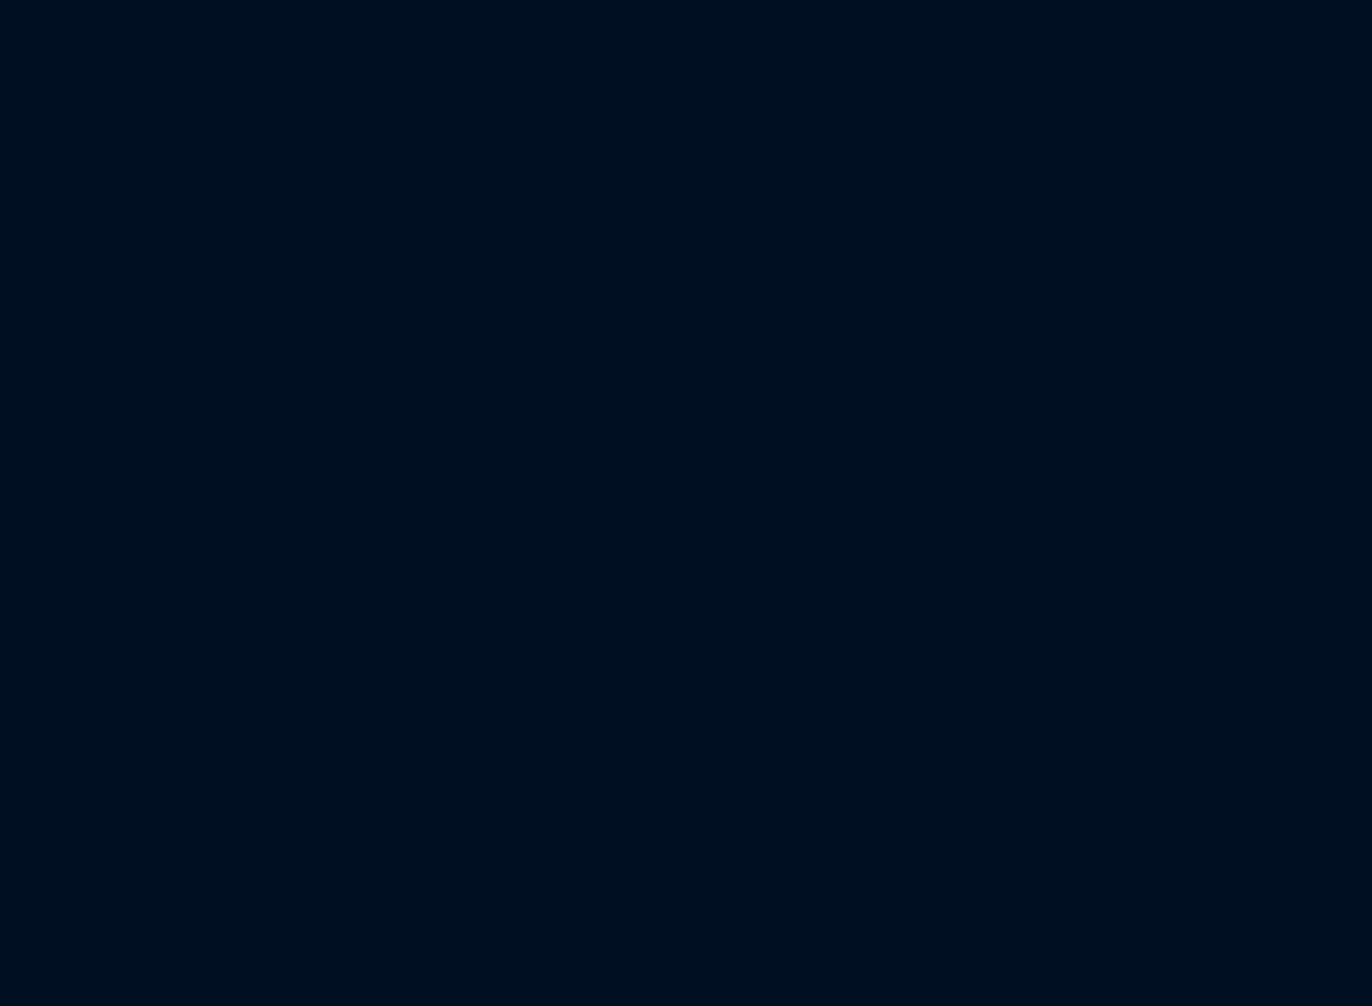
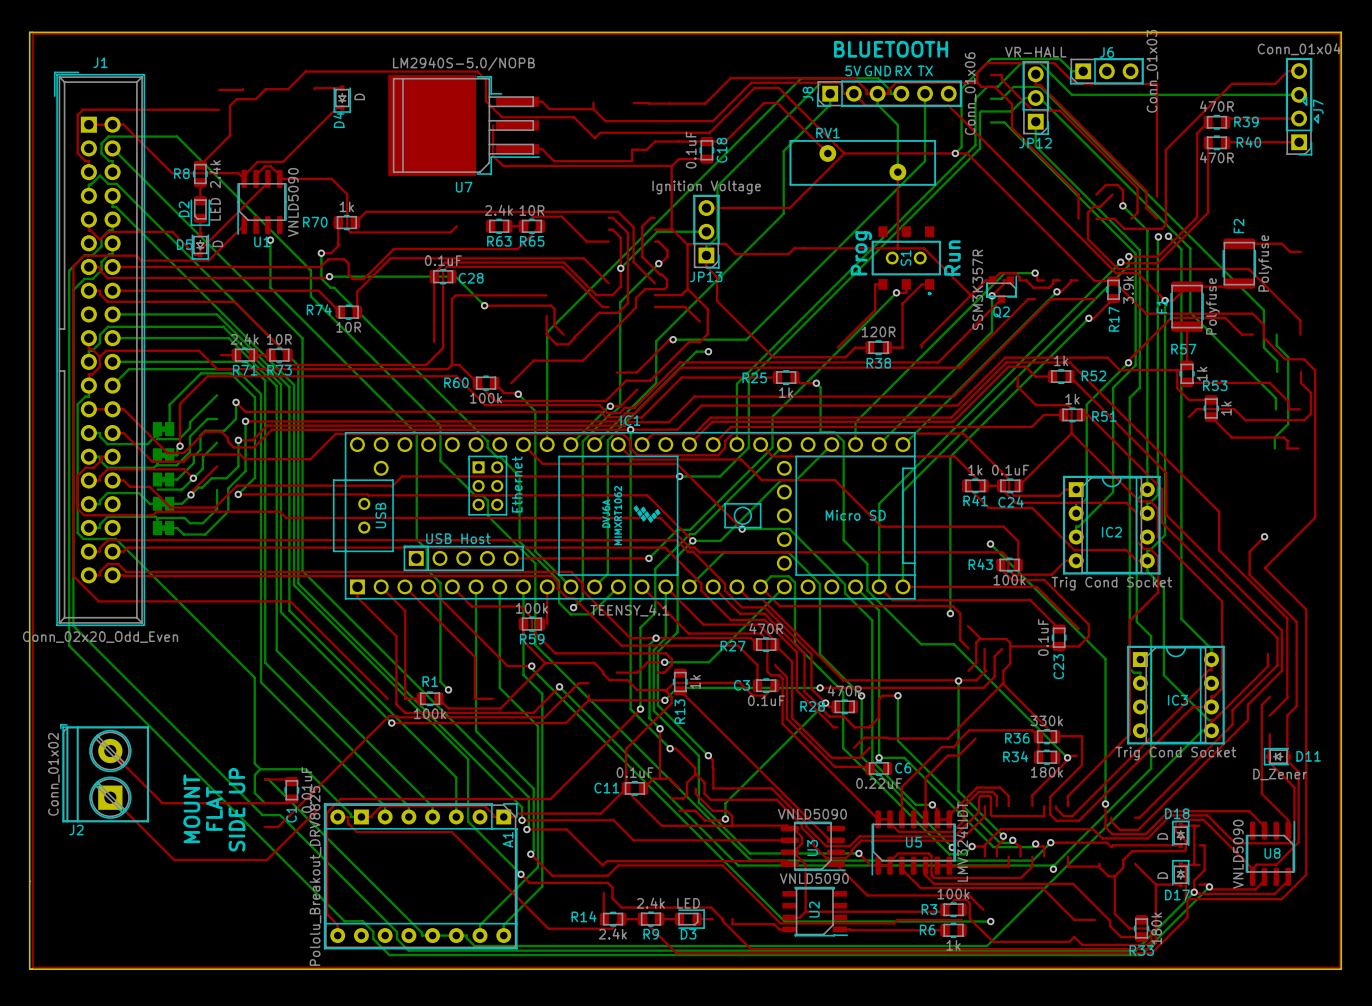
board edge: none -> (29, 32) (1341, 32) (1341, 969) (29, 969) (29, 32)
top track: none -> (32, 33) (32, 967) (1340, 967) (1340, 33) (32, 33)
text: none -> BLUETOOTH (891, 49)
text: none -> 5V (853, 70)
text: none -> GND (877, 70)
text: none -> RX (903, 70)
text: none -> TX (925, 70)
bottom track: none -> (1083, 71) (1072, 71) (1059, 58) (991, 58) (961, 88) (961, 147) (955, 153)
J6: none -> Conn_01x03 (1106, 71)
top track: none -> (1299, 71) (1288, 71) (1275, 83) (1231, 83) (1165, 149) (1165, 224) (1161, 228) (1124, 228) (1114, 218) (1096, 218)
top track: none -> (1035, 74) (1035, 85) (1040, 85) (1146, 191) (1146, 207) (1157, 218)
top track: none -> (990, 75) (1001, 75) (1001, 79) (1032, 110) (1060, 110) (1137, 188) (1137, 212) (1131, 218)
top track: none -> (977, 82) (977, 72) (986, 63) (1054, 63) (1075, 84) (1156, 84) (1156, 196)
top track: none -> (977, 82) (981, 86) (994, 86) (1012, 104) (1012, 128) (1078, 194) (1078, 218)
top track: none -> (977, 82) (896, 82) (888, 90) (888, 93) (866, 93) (866, 90) (854, 78) (730, 78) (705, 103) (633, 103)
top track: none -> (342, 88) (314, 89)
top track: none -> (243, 89) (219, 90)
bottom track: none -> (830, 93) (830, 104) (783, 151) (783, 213) (656, 341) (656, 383) (594, 444)
bottom track: none -> (853, 93) (842, 93) (842, 86) (839, 82) (820, 82) (717, 186) (717, 236) (709, 244) (706, 244) (706, 255)
bottom track: none -> (877, 93) (877, 104) (897, 124) (897, 172)
J8: none -> Conn_01x06 (889, 93)
bottom track: none -> (901, 93) (890, 93) (890, 90) (878, 78) (801, 78) (547, 332) (547, 444)
bottom track: none -> (925, 93) (925, 161) (746, 339) (673, 339)
bottom track: none -> (1299, 94) (1071, 94) (1040, 63) (1021, 63) (997, 86) (987, 86) (975, 98) (975, 145) (736, 383) (736, 444)
JP12: none -> VR-HALL (1035, 97)
line: none -> (1306, 97) (1302, 101) (1306, 104) (1306, 97)
bottom track: none -> (990, 98) (1001, 98) (1013, 86) (1040, 86) (1263, 310) (1263, 347) (1277, 360) (1277, 371)
D4: none -> D (342, 99)
top track: none -> (517, 101) (542, 101) (549, 109) (593, 109)
top track: none -> (593, 103) (593, 109)
J7: none -> Conn_01x04 (1299, 106)
top track: none -> (342, 107) (337, 107) (283, 161) (257, 161) (242, 177)
top track: none -> (219, 109) (83, 109) (77, 115) (77, 153) (85, 161) (88, 161) (88, 172)
top track: none -> (593, 109) (605, 121) (712, 121) (751, 82) (839, 82) (842, 86) (842, 93) (853, 93) (865, 105) (948, 105) (1116, 273) (1137, 273) (1165, 300) (1173, 300) (1187, 286) (1236, 286) (1239, 283)
line: none -> (1318, 115) (1318, 122) (1314, 118) (1318, 115)
top track: none -> (1299, 118) (1229, 118) (1225, 122)
bottom track: none -> (1035, 121) (1035, 146) (1139, 250) (1139, 387) (1129, 397) (1129, 668) (1133, 672) (1140, 672) (1140, 683)
bottom track: none -> (990, 122) (1004, 122) (1135, 253) (1135, 365) (1113, 387) (1113, 492) (1078, 526) (1076, 526) (1076, 537)
top track: none -> (1208, 122) (1197, 133) (1197, 217) (1157, 256) (1128, 256)
R39: none -> 470R (1216, 122)
top track: none -> (88, 124) (123, 124) (172, 173) (238, 173) (244, 178)
U7: none -> LM2940S-5.0/NOPB (463, 125)
top track: none -> (493, 125) (493, 155) (503, 166) (671, 166) (678, 159) (706, 159)
top track: none -> (1208, 142) (1208, 212) (1157, 263) (1120, 262)
R40: none -> 470R (1216, 142)
top track: none -> (1299, 142) (1225, 142)
bottom track: none -> (112, 148) (302, 338) (302, 570) (528, 797) (528, 827) (526, 829)
top track: none -> (517, 149) (542, 149) (554, 161) (632, 161) (632, 149) (646, 149) (655, 141) (725, 141) (763, 103) (777, 103) (827, 153)
C18: none -> 0.1uF (706, 150)
top track: none -> (844, 153) (967, 153) (1094, 281) (1113, 281) (1146, 313) (1252, 313) (1263, 324) (1263, 337) (1285, 359) (1303, 359) (1315, 370) (1315, 517) (1264, 568) (1306, 609) (1306, 874) (1281, 899) (1187, 899)
top track: none -> (844, 153) (778, 88) (754, 88) (709, 132) (600, 132) (594, 138) (573, 117) (502, 117) (486, 101) (486, 80) (477, 71) (305, 71) (288, 89) (265, 89) (255, 99) (236, 99) (230, 105) (230, 135) (200, 165)
top track: none -> (844, 153) (789, 208) (706, 208)
via: none -> (955, 153)
RV1: none -> (862, 162)
top track: none -> (671, 166) (671, 229)
bottom track: none -> (112, 172) (112, 161) (109, 161) (101, 153) (101, 143) (108, 136) (177, 136) (310, 270) (310, 296) (440, 425) (440, 460) (475, 495) (482, 495) (487, 500) (487, 515) (535, 563) (535, 645) (750, 860) (1032, 860) (1050, 842)
top track: none -> (897, 172) (897, 248)
R8: none -> 2.4k (200, 174)
top track: none -> (256, 178) (256, 175) (264, 166) (270, 166) (279, 175) (279, 178) (331, 178) (347, 194) (347, 229) (350, 232) (450, 232) (456, 226)
top track: none -> (267, 178) (267, 182) (200, 248) (200, 254) (195, 254) (172, 231) (107, 231) (99, 239) (88, 230) (88, 219)
top track: none -> (200, 182) (200, 200)
top track: none -> (1096, 194) (1105, 184) (1117, 184) (1122, 190) (1122, 205)
top track: none -> (1112, 194) (1100, 206) (1093, 206) (1087, 212) (1087, 239) (1117, 268) (1248, 268) (1300, 320) (1300, 334)
bottom track: none -> (88, 195) (88, 184) (99, 175) (108, 183) (116, 183) (298, 365) (298, 583) (522, 807) (522, 820)
bottom track: none -> (112, 195) (112, 206) (116, 206) (294, 385) (294, 585) (468, 759) (468, 821) (520, 874)
U1: none -> VNLD5090 (261, 202)
bottom track: none -> (1122, 205) (1147, 230) (1147, 489) (1136, 500) (1136, 621) (1151, 636) (1151, 768) (1054, 865) (738, 865) (559, 686)
via: none -> (1122, 205)
D2: none -> LED (200, 210)
top track: none -> (608, 217) (612, 217) (627, 232) (627, 303) (618, 312) (598, 312) (568, 344) (556, 344) (546, 334) (546, 315)
top track: none -> (654, 217) (650, 217) (642, 226) (642, 256) (667, 279) (667, 286) (664, 289) (645, 289) (636, 298) (636, 307) (582, 360) (533, 360) (511, 383)
top track: none -> (200, 218) (200, 235)
bottom track: none -> (112, 219) (112, 230) (109, 230) (101, 238) (101, 246) (92, 255) (84, 255) (69, 270) (69, 645) (344, 921) (362, 921) (373, 931) (373, 938) (389, 955) (1141, 955) (1209, 886)
top track: none -> (338, 222) (339, 244) (331, 253) (321, 253)
R70: none -> 1k (346, 222)
top track: none -> (355, 222) (365, 211) (618, 211) (633, 227) (633, 261) (654, 283)
top track: none -> (244, 225) (208, 260) (141, 260) (136, 255) (84, 255) (73, 266) (73, 575) (98, 601) (290, 601) (387, 698)
R63: none -> 2.4k (499, 226)
top track: none -> (507, 226) (523, 226) (533, 216) (561, 216) (586, 241) (608, 241)
R65: none -> 10R (531, 226)
top track: none -> (540, 226) (517, 248) (393, 248) (363, 279) (353, 279) (348, 274) (348, 263) (344, 259) (328, 259) (320, 267) (112, 267)
top track: none -> (608, 229) (612, 229) (620, 237) (620, 286) (612, 295) (596, 295) (564, 262) (444, 262) (434, 272) (434, 342)
top track: none -> (654, 229) (672, 229) (687, 244)
bottom track: none -> (706, 231) (657, 231) (620, 268)
JP13: none -> Ignition Voltage (706, 231)
bottom track: none -> (1158, 236) (1157, 494) (1149, 502) (1147, 502) (1147, 513)
via: none -> (1158, 236)
bottom track: none -> (1168, 236) (1181, 249) (1181, 618) (1211, 649) (1211, 659)
via: none -> (1168, 236)
bottom track: none -> (270, 240) (270, 287) (416, 434) (416, 539) (426, 549) (426, 569) (440, 583) (440, 681) (448, 689)
via: none -> (270, 240)
top track: none -> (654, 241) (658, 241) (667, 250) (667, 256) (658, 263)
bottom track: none -> (112, 243) (112, 254) (109, 254) (101, 262) (101, 270) (92, 278) (84, 278) (73, 290) (73, 625) (262, 815) (280, 815) (397, 931) (397, 939) (408, 950) (1135, 950) (1194, 892)
top track: none -> (1239, 243) (1281, 243) (1289, 251) (1300, 251)
top track: none -> (687, 244) (726, 244) (736, 254) (788, 254) (794, 248) (924, 248) (971, 295)
top track: none -> (687, 244) (687, 289)
D5: none -> D (200, 245)
bottom track: none -> (321, 253) (321, 278) (330, 287) (334, 287) (487, 441) (487, 447) (519, 476) (519, 541) (559, 580) (559, 602) (570, 614) (590, 614) (618, 586)
via: none -> (321, 253)
text: none -> Prog (861, 253)
top track: none -> (706, 255) (706, 266) (717, 277) (717, 300) (773, 357) (845, 357) (855, 347) (869, 347)
bottom track: none -> (1128, 256) (1128, 265) (902, 491) (902, 586)
via: none -> (1128, 256)
text: none -> Run (952, 258)
S1: none -> (906, 260)
bottom track: none -> (1120, 262) (879, 503) (879, 586)
via: none -> (1120, 262)
bottom track: none -> (658, 263) (620, 302) (620, 406) (582, 441) (582, 598) (573, 607)
via: none -> (658, 263)
F2: none -> Polyfuse (1239, 263)
top track: none -> (88, 267) (99, 267) (99, 270) (107, 278) (329, 276)
via: none -> (620, 268)
top track: none -> (1035, 273) (1037, 280) (1043, 280)
bottom track: none -> (1035, 273) (1004, 273) (855, 422) (855, 444)
via: none -> (1035, 273)
bottom track: none -> (329, 276) (455, 276) (484, 305)
via: none -> (329, 276)
C28: none -> 0.1uF (443, 276)
top track: none -> (1010, 280) (1003, 280) (1003, 284) (992, 295)
top track: none -> (1059, 280) (1053, 280) (1053, 283) (1049, 287) (1033, 287) (1026, 280) (1019, 280) (1019, 277) (1015, 273) (999, 273) (992, 280) (985, 280) (921, 344) (921, 347)
top track: none -> (1077, 280) (1070, 280) (1061, 291) (1056, 291)
top track: none -> (608, 283) (583, 258) (390, 258) (357, 291) (357, 312)
top track: none -> (882, 284) (875, 284) (875, 310) (837, 347)
top track: none -> (906, 284) (906, 292) (896, 292)
top track: none -> (929, 284) (921, 284) (902, 303) (902, 347) (887, 347)
top track: none -> (687, 289) (707, 309) (707, 334) (699, 342) (688, 342) (650, 380) (626, 380) (605, 400) (495, 400) (459, 364) (452, 364)
top track: none -> (687, 289) (681, 295) (654, 295)
Q2: none -> SSM3K357R (1001, 289)
R17: none -> 3.9k (1113, 289)
top track: none -> (88, 290) (99, 290) (99, 294) (107, 301) (234, 301) (287, 355)
top track: none -> (112, 290) (318, 290) (340, 312)
bottom track: none -> (1056, 291) (902, 444)
via: none -> (1056, 291)
bottom track: none -> (896, 292) (772, 416) (772, 447) (690, 529) (677, 529) (648, 558)
via: none -> (896, 292)
top track: none -> (546, 295) (455, 295) (452, 299) (452, 364)
bottom track: none -> (992, 295) (992, 331) (879, 444)
via: none -> (992, 295)
top track: none -> (1094, 298) (1051, 299) (953, 396) (694, 396) (668, 422) (628, 422) (624, 425) (267, 425) (252, 440) (238, 440)
top track: none -> (1113, 298) (1093, 318) (1088, 318)
top track: none -> (1001, 299) (938, 362) (679, 362) (634, 407) (624, 407) (619, 413) (607, 413) (599, 405) (485, 405) (456, 376) (207, 376) (180, 403) (180, 446)
top track: none -> (1035, 299) (1028, 299) (959, 367) (680, 367) (635, 413) (625, 413) (621, 417) (605, 417) (600, 411) (245, 411) (236, 402)
bottom track: none -> (1165, 300) (1165, 535) (1149, 550) (1147, 550) (1147, 571) (1163, 587) (1163, 675) (1208, 720) (1211, 720) (1211, 730) (1201, 730) (986, 946) (474, 946) (466, 938) (466, 935) (422, 935) (422, 932) (268, 779) (264, 779)
via: none -> (1165, 300)
top track: none -> (484, 305) (551, 305) (554, 309) (554, 325) (563, 334)
via: none -> (484, 305)
top track: none -> (608, 306) (602, 306) (562, 266) (447, 266) (443, 270) (443, 348) (426, 364) (280, 364) (270, 355) (253, 355)
top track: none -> (654, 306) (685, 306) (699, 321)
F1: none -> Polyfuse (1187, 306)
R74: none -> 10R (348, 312)
bottom track: none -> (112, 314) (216, 314) (289, 386) (289, 610) (456, 777) (456, 816)
bottom track: none -> (1088, 318) (950, 456) (950, 613)
via: none -> (1088, 318)
top track: none -> (1187, 326) (1187, 365) (1182, 370) (1119, 370) (1107, 357) (1005, 357) (957, 405) (701, 405) (677, 429) (271, 429) (254, 447) (233, 447) (221, 431) (205, 431) (184, 452) (167, 452) (123, 409) (88, 409)
top track: none -> (1252, 334) (1241, 334) (1225, 317) (1171, 317) (1128, 362)
bottom track: none -> (1276, 334) (1276, 345) (1288, 357) (1288, 424) (1274, 437) (1274, 448)
top track: none -> (88, 338) (88, 349) (92, 349) (99, 356)
bottom track: none -> (112, 338) (228, 338) (276, 386) (276, 650) (432, 806) (432, 816)
top track: none -> (673, 339) (669, 339) (636, 372) (616, 372)
via: none -> (673, 339)
R38: none -> 120R (878, 347)
J1: none -> Conn_02x20_Odd_Even (99, 348)
bottom track: none -> (708, 351) (696, 351) (607, 440) (607, 573) (594, 586)
via: none -> (708, 351)
top track: none -> (220, 355) (236, 355)
R71: none -> 2.4k (244, 355)
R73: none -> 10R (279, 355)
top track: none -> (99, 356) (99, 366) (92, 374) (88, 374) (88, 385)
top track: none -> (99, 356) (106, 350) (199, 350) (217, 369) (447, 369) (452, 364)
bottom track: none -> (88, 361) (88, 350) (92, 350) (99, 343) (99, 334) (108, 326) (223, 326) (280, 384) (280, 612) (391, 723)
bottom track: none -> (112, 361) (246, 361) (265, 380) (265, 662) (408, 806) (408, 816)
bottom track: none -> (1128, 362) (1086, 404) (1086, 498) (1082, 502) (1076, 502) (1076, 513)
via: none -> (1128, 362)
top track: none -> (1177, 370) (1177, 388) (1188, 399) (1211, 399)
top track: none -> (1300, 371) (1300, 382) (1310, 392) (1310, 413) (1304, 420) (1245, 420) (1234, 409) (1196, 409) (1188, 417)
R57: none -> 1k (1187, 373)
top track: none -> (1017, 376) (1017, 386) (1036, 405) (1068, 405) (1071, 408) (1071, 433)
top track: none -> (1052, 376) (1035, 376) (1025, 366) (1008, 366) (953, 421) (712, 421) (689, 444)
R52: none -> 1k (1061, 376)
top track: none -> (1069, 376) (1166, 472) (1166, 514) (1282, 630) (1282, 670) (1247, 704) (1247, 720) (1138, 829) (1119, 829) (1111, 821) (1111, 817)
top track: none -> (777, 377) (681, 377) (641, 417) (627, 417) (623, 421) (244, 421)
R25: none -> 1k (786, 377)
top track: none -> (794, 377) (800, 383) (816, 383)
top track: none -> (1187, 382) (1269, 382) (1288, 401) (1288, 409) (1299, 409)
R60: none -> 100k (486, 383)
top track: none -> (494, 383) (504, 393) (518, 394)
bottom track: none -> (816, 383) (820, 387) (820, 432) (834, 432) (843, 441) (843, 540) (867, 563) (867, 590) (921, 644) (954, 644) (1067, 757)
via: none -> (816, 383)
bottom track: none -> (88, 385) (88, 396) (85, 396) (77, 404) (77, 533) (83, 538) (116, 538) (254, 677) (254, 763) (260, 769)
bottom track: none -> (112, 385) (129, 369) (236, 369) (261, 394) (261, 682) (385, 806) (385, 816)
top track: none -> (637, 389) (620, 406) (610, 406)
bottom track: none -> (518, 394) (535, 411) (535, 551) (570, 586)
via: none -> (518, 394)
bottom track: none -> (217, 395) (189, 422) (189, 428) (179, 439) (157, 439) (157, 429)
bottom track: none -> (236, 402) (236, 418) (224, 430) (205, 430) (200, 435) (200, 449) (193, 456) (193, 463) (177, 479) (169, 479)
via: none -> (236, 402)
bottom track: none -> (610, 406) (570, 444)
via: none -> (610, 406)
R53: none -> 1k (1211, 408)
bottom track: none -> (1275, 409) (1275, 398) (1190, 312) (1190, 248) (1039, 97) (1024, 97) (1011, 111) (979, 112) (979, 148) (748, 379) (748, 447) (720, 476) (679, 476)
top track: none -> (1063, 414) (1043, 414) (1031, 426) (730, 426) (713, 444)
R51: none -> 1k (1072, 414)
top track: none -> (1081, 414) (1087, 414) (1162, 489) (1162, 522) (1277, 637) (1277, 665) (1232, 710) (1232, 724) (1139, 817) (1135, 817)
top track: none -> (1211, 417) (1231, 437) (1284, 437) (1287, 440) (1287, 448) (1298, 448)
bottom track: none -> (217, 418) (207, 418) (189, 436) (189, 452) (176, 465) (157, 465) (157, 455)
bottom track: none -> (245, 421) (245, 471) (228, 488) (228, 511) (205, 534) (183, 534) (177, 528) (169, 528)
via: none -> (245, 421)
part: none -> (163, 429)
bottom track: none -> (169, 429) (169, 404) (201, 373) (230, 373) (255, 397) (255, 477) (238, 494)
bottom track: none -> (630, 429) (630, 709) (670, 748)
via: none -> (630, 429)
bottom track: none -> (88, 433) (99, 433) (99, 436) (107, 444) (147, 444) (157, 434)
top track: none -> (112, 433) (123, 433) (152, 461) (183, 461) (190, 454) (240, 454) (244, 459) (310, 459) (335, 434) (623, 434) (630, 440) (630, 448) (637, 455) (717, 455) (725, 448) (725, 441) (732, 433) (963, 433) (1009, 479) (1009, 490) (1014, 495) (1059, 495) (1065, 489) (1076, 489)
top track: none -> (1071, 433) (1139, 501) (1150, 501) (1157, 508) (1157, 537) (1222, 601) (1222, 688) (1214, 696) (1211, 696) (1211, 706) (1192, 706) (1079, 820) (1056, 820) (1050, 814) (1050, 796) (1082, 765) (1082, 736) (1055, 736)
top track: none -> (1071, 433) (1019, 485)
bottom track: none -> (238, 440) (238, 466) (226, 478) (211, 478) (202, 487) (198, 487) (182, 503) (149, 503) (139, 493) (107, 493) (99, 500) (99, 504) (88, 504)
via: none -> (238, 440)
bottom track: none -> (217, 442) (202, 456) (202, 468) (182, 489) (157, 489)
top track: none -> (523, 444) (542, 463) (677, 463) (742, 529)
top track: none -> (618, 444) (633, 459) (741, 459) (761, 480) (834, 480) (881, 526) (1003, 526) (1018, 541) (1018, 565)
top track: none -> (642, 444) (652, 434) (694, 434) (710, 417) (951, 417) (1006, 362) (1069, 362) (1219, 511) (1219, 550) (1287, 618) (1287, 698) (1269, 715)
top track: none -> (760, 444) (772, 456) (954, 456) (984, 485) (1001, 485) (1001, 488) (1015, 502) (1126, 502) (1136, 513) (1136, 541) (1144, 548) (1150, 548) (1158, 556) (1158, 592) (1129, 620) (1129, 734) (1067, 796) (1067, 806)
bottom track: none -> (784, 444) (694, 534) (689, 534) (655, 568) (655, 612) (640, 627) (640, 709)
bottom track: none -> (831, 444) (796, 480) (781, 480) (720, 540) (692, 540) (677, 555) (677, 632) (657, 651) (657, 705) (708, 755)
bottom track: none -> (180, 446) (177, 448) (177, 455) (169, 455)
via: none -> (180, 446)
part: none -> (163, 455)
bottom track: none -> (88, 456) (99, 456) (99, 460) (107, 467) (153, 467) (157, 464)
top track: none -> (112, 456) (101, 456) (101, 460) (93, 467) (85, 467) (77, 475) (77, 508) (84, 515) (153, 515) (156, 511) (279, 511) (286, 518) (660, 518) (689, 547) (694, 547) (699, 552) (1002, 552) (1008, 558) (1008, 569) (1013, 574) (1051, 574) (1065, 560) (1076, 560)
top track: none -> (217, 466) (190, 492) (190, 494)
top track: none -> (679, 476) (402, 476) (391, 486)
via: none -> (679, 476)
top track: none -> (193, 478) (184, 469) (107, 469) (99, 476) (99, 480) (88, 480)
via: none -> (193, 478)
part: none -> (163, 479)
top track: none -> (112, 480) (123, 480) (130, 486) (149, 486) (170, 507) (215, 507) (237, 485) (392, 485)
top track: none -> (966, 485) (988, 508) (1032, 508) (1074, 550) (1126, 550) (1136, 560) (1147, 560)
R41: none -> 1k (975, 485)
C24: none -> 0.1uF (1010, 485)
bottom track: none -> (217, 490) (217, 509) (202, 523) (189, 523) (184, 518) (157, 518) (157, 528)
via: none -> (190, 494)
top track: none -> (238, 494) (647, 495) (692, 540)
via: none -> (238, 494)
part: none -> (163, 503)
IC1: none -> TEENSY_4.1 (624, 515)
bottom track: none -> (157, 518) (155, 516) (107, 516) (99, 524) (99, 527) (88, 527)
IC2: none -> Trig Cond Socket (1111, 525)
part: none -> (163, 528)
bottom track: none -> (742, 529) (789, 528) (845, 584) (845, 593) (872, 620) (872, 761) (915, 804) (932, 804)
via: none -> (742, 529)
top track: none -> (1264, 536) (1249, 551) (1249, 574) (1296, 621) (1296, 706) (1287, 715) (1287, 750) (1288, 761) (1298, 772) (1298, 842) (1276, 864) (1256, 864) (1252, 868)
via: none -> (1264, 536)
via: none -> (692, 540)
bottom track: none -> (990, 544) (1105, 659) (1105, 804)
via: none -> (990, 544)
top track: none -> (88, 551) (99, 551) (99, 548) (107, 540) (676, 540) (688, 551) (693, 551) (725, 583) (725, 590) (741, 607) (764, 607) (811, 654) (811, 688) (829, 706) (835, 706)
top track: none -> (112, 551) (123, 551) (127, 547) (665, 547) (701, 583) (701, 590) (730, 620) (764, 620) (796, 652) (796, 690) (833, 727) (837, 727)
top track: none -> (511, 558) (648, 558)
via: none -> (648, 558)
top track: none -> (1000, 565) (1000, 568) (1012, 580) (1044, 580) (1088, 624) (1088, 636) (1078, 646) (1010, 646)
R43: none -> 100k (1009, 565)
top track: none -> (88, 575) (99, 575) (99, 571) (107, 564) (118, 564) (126, 571) (571, 571) (582, 583) (582, 590) (630, 638) (751, 638) (757, 644)
top track: none -> (112, 575) (551, 576) (557, 582) (557, 588) (567, 598) (574, 598) (621, 645) (737, 645) (757, 665) (757, 685)
top track: none -> (357, 586) (357, 597) (396, 636) (396, 704) (405, 712) (533, 712) (559, 686)
top track: none -> (381, 586) (405, 610) (405, 698) (421, 698)
top track: none -> (404, 586) (474, 656) (474, 698) (492, 698)
top track: none -> (428, 586) (507, 666) (531, 666)
top track: none -> (452, 586) (471, 606) (520, 606) (531, 617) (531, 629) (555, 653) (665, 653) (671, 659) (671, 664) (664, 672) (657, 672)
bottom track: none -> (476, 586) (476, 731) (533, 788) (533, 851) (530, 854)
bottom track: none -> (499, 586) (499, 687) (537, 726) (537, 867) (480, 925) (480, 935)
bottom track: none -> (523, 586) (523, 675) (542, 693) (542, 886) (503, 925) (503, 935)
top track: none -> (547, 586) (547, 624)
top track: none -> (642, 586) (688, 633) (760, 633) (767, 639) (767, 671) (771, 675) (779, 675) (782, 678) (782, 723) (878, 819) (890, 819) (890, 823) (898, 831) (952, 831) (963, 820) (963, 807) (978, 791) (992, 791) (996, 796) (996, 806)
top track: none -> (665, 586) (703, 624) (758, 624) (774, 640) (774, 644) (792, 661) (792, 718) (831, 757) (859, 757) (870, 747)
bottom track: none -> (665, 586) (665, 638) (653, 650) (653, 710) (698, 755) (698, 802) (749, 853) (858, 853)
bottom track: none -> (689, 586) (723, 552) (788, 552) (819, 583) (819, 654) (861, 695) (861, 756) (952, 847)
top track: none -> (713, 586) (740, 613) (764, 613) (804, 653) (804, 691) (829, 716) (843, 716) (854, 727) (869, 727) (878, 717) (878, 699) (882, 695) (897, 695)
top track: none -> (736, 586) (749, 599) (762, 599) (843, 680) (976, 680) (985, 670) (984, 648)
top track: none -> (760, 586) (779, 606) (952, 606) (960, 613) (960, 640) (968, 648)
bottom track: none -> (760, 586) (771, 576) (788, 576) (794, 582) (794, 643) (843, 692) (843, 748) (949, 854) (964, 854) (972, 846)
bottom track: none -> (784, 586) (708, 662) (664, 662)
bottom track: none -> (855, 586) (879, 610) (879, 757) (904, 757) (993, 847) (1032, 847) (1035, 843)
top track: none -> (879, 586) (892, 600) (1030, 600) (1059, 628)
top track: none -> (902, 586) (1036, 586) (1078, 628)
via: none -> (573, 607)
via: none -> (950, 613)
top track: none -> (523, 624) (523, 641) (545, 663)
R59: none -> 100k (531, 624)
top track: none -> (967, 625) (979, 639)
C23: none -> 0.1uF (1059, 637)
bottom track: none -> (656, 638) (649, 644) (649, 718) (660, 728)
via: none -> (656, 638)
top track: none -> (979, 639) (1006, 639) (1010, 643) (1010, 663) (1003, 670) (1003, 683) (948, 738) (887, 738)
top track: none -> (979, 639) (976, 642) (976, 662) (968, 670)
R27: none -> 470R (766, 644)
top track: none -> (1002, 648) (994, 656) (994, 676) (983, 687) (820, 687)
top track: none -> (1267, 653) (1267, 666) (1214, 720) (1211, 720) (1211, 730)
top track: none -> (1211, 659) (1211, 670) (1208, 670) (1201, 677) (1201, 687) (1072, 816) (1063, 816) (1056, 806)
top track: none -> (664, 662) (647, 662) (637, 672) (616, 672)
via: none -> (664, 662)
top track: none -> (545, 663) (500, 708) (448, 708) (438, 698)
top track: none -> (545, 663) (594, 663) (609, 680) (627, 680) (637, 690) (664, 690) (671, 696) (671, 703) (626, 748) (626, 790) (661, 825) (732, 825)
top track: none -> (774, 665) (786, 677) (786, 718) (834, 766) (870, 766) (870, 768)
bottom track: none -> (531, 666) (531, 668) (784, 921) (990, 921)
via: none -> (531, 666)
bottom track: none -> (958, 680) (958, 791) (1003, 836)
via: none -> (958, 680)
R13: none -> 1k (680, 681)
top track: none -> (588, 683) (578, 683) (544, 717) (388, 716) (278, 826) (264, 826)
top track: none -> (1002, 683) (1055, 736)
C3: none -> 0.1uF (766, 685)
top track: none -> (774, 685) (765, 695) (752, 695) (740, 682) (673, 682) (665, 690)
via: none -> (559, 686)
bottom track: none -> (820, 687) (677, 687) (664, 700)
via: none -> (820, 687)
via: none -> (448, 689)
top track: none -> (680, 690) (829, 840) (836, 840)
top track: none -> (588, 695) (588, 700)
via: none -> (861, 695)
bottom track: none -> (897, 695) (897, 740) (1000, 842) (1010, 842) (1012, 840)
via: none -> (897, 695)
IC3: none -> Trig Cond Socket (1175, 695)
top track: none -> (1269, 696) (1261, 704) (1261, 793) (1288, 820) (1288, 830)
R1: none -> 100k (430, 698)
top track: none -> (588, 700) (664, 700)
top track: none -> (588, 700) (566, 723) (391, 723)
via: none -> (664, 700)
bottom track: none -> (825, 703) (725, 803) (725, 819)
via: none -> (825, 703)
R28: none -> 470R (844, 706)
top track: none -> (640, 709) (550, 799) (340, 799) (327, 812) (327, 914) (337, 925) (337, 935)
via: none -> (640, 709)
via: none -> (391, 723)
top track: none -> (660, 728) (660, 778)
via: none -> (660, 728)
top track: none -> (1269, 734) (1268, 761) (1294, 787) (1294, 840) (1291, 843) (1235, 843) (1207, 815) (1170, 815) (1147, 838) (1102, 838) (1093, 829) (1000, 829) (984, 844) (984, 856)
R36: none -> 330k (1046, 736)
top track: none -> (887, 737) (864, 737) (854, 747)
top track: none -> (975, 738) (958, 755) (948, 755) (925, 778) (925, 819)
top track: none -> (670, 748) (676, 748) (695, 767) (695, 773) (704, 782) (704, 793) (710, 799) (776, 799) (801, 825) (801, 827) (813, 839) (813, 845) (826, 858) (845, 858) (861, 840) (960, 840) (984, 816) (984, 806)
via: none -> (670, 748)
top track: none -> (110, 751) (162, 803) (287, 803) (291, 799)
top track: none -> (708, 755) (712, 760) (713, 788) (771, 788) (826, 846) (849, 846) (859, 836) (954, 836) (978, 812) (978, 797) (980, 796) (990, 797) (992, 816) (1044, 816) (1044, 806)
via: none -> (708, 755)
top track: none -> (1076, 755) (1067, 757) (1067, 760) (1032, 795) (1032, 806)
D11: none -> D_Zener (1277, 756)
via: none -> (879, 757)
top track: none -> (1038, 757) (1038, 736) (1032, 730) (969, 730) (953, 747) (941, 747) (901, 786) (901, 819)
R34: none -> 180k (1046, 757)
via: none -> (1067, 757)
C6: none -> 0.22uF (878, 768)
bottom track: none -> (260, 769) (254, 774) (254, 793) (264, 803)
bottom track: none -> (260, 769) (305, 769) (350, 814) (350, 816) (361, 816)
J2: none -> Conn_01x02 (104, 773)
top track: none -> (695, 773) (687, 782) (687, 794) (683, 798) (671, 798)
top track: none -> (264, 779) (289, 779) (291, 781)
top track: none -> (626, 788) (600, 813) (517, 813) (514, 816) (493, 816) (493, 814) (485, 806) (381, 806) (371, 816) (361, 816)
C11: none -> 0.1uF (634, 788)
top track: none -> (643, 788) (653, 778) (669, 778) (679, 788)
top track: none -> (695, 788) (695, 793) (712, 810) (726, 810) (732, 816) (732, 825)
C1: none -> 0.01uF (291, 790)
top track: none -> (110, 797) (174, 860) (266, 860) (316, 810)
top track: none -> (932, 804) (937, 809) (937, 819) (949, 819) (949, 815) (977, 787) (1000, 787) (1008, 796) (1008, 806)
via: none -> (932, 804)
top track: none -> (1105, 804) (1105, 827) (1112, 834) (1145, 834) (1168, 811) (1249, 811) (1264, 826) (1264, 830)
via: none -> (1105, 804)
text: none -> MOUNT (191, 808)
text: none -> FLAT (214, 808)
text: none -> SIDE UP (236, 809)
top track: none -> (679, 810) (695, 810) (704, 820) (725, 819)
top track: none -> (337, 816) (348, 816) (348, 823) (356, 831) (451, 831) (548, 928) (612, 928) (621, 919) (642, 919) (676, 953) (1151, 953) (1187, 917) (1187, 899)
via: none -> (725, 819)
top track: none -> (522, 820) (613, 820) (633, 840) (789, 840)
via: none -> (522, 820)
top track: none -> (732, 825) (786, 825) (793, 828) (802, 837) (802, 843) (793, 852)
top track: none -> (1180, 825) (1199, 825)
top track: none -> (1194, 825) (1194, 864)
top track: none -> (526, 829) (566, 829) (602, 865) (606, 861) (786, 861) (789, 864)
via: none -> (526, 829)
D18: none -> D (1180, 834)
top track: none -> (1003, 836) (1003, 839) (996, 846) (996, 856)
via: none -> (1003, 836)
top track: none -> (1012, 840) (1020, 846) (1020, 856)
via: none -> (1012, 840)
U5: none -> LMV324LIDT (913, 842)
top track: none -> (1050, 842) (1106, 842) (1111, 847) (1113, 845) (1180, 845)
via: none -> (1050, 842)
top track: none -> (1035, 843) (1038, 846) (1044, 846) (1044, 856)
via: none -> (1035, 843)
top track: none -> (1199, 845) (1204, 845) (1204, 870) (1194, 880) (1195, 890)
U3: none -> VNLD5090 (813, 846)
top track: none -> (972, 846) (984, 846)
via: none -> (972, 846)
via: none -> (952, 847)
top track: none -> (793, 852) (805, 864) (805, 911)
top track: none -> (858, 853) (871, 865) (890, 865) (890, 861) (898, 853) (928, 853) (931, 856) (931, 875) (934, 878) (1020, 878) (1032, 866) (1032, 856)
via: none -> (858, 853)
U8: none -> VNLD5090 (1270, 853)
top track: none -> (530, 854) (552, 875) (607, 875) (618, 865) (722, 865) (780, 923) (894, 923) (897, 920) (962, 920)
via: none -> (530, 854)
top track: none -> (1008, 856) (1008, 866) (937, 865)
top track: none -> (1067, 856) (1067, 866) (1099, 866)
top track: none -> (1099, 863) (1099, 867) (1108, 876) (1114, 876)
top track: none -> (1135, 863) (1155, 884)
top track: none -> (836, 864) (867, 895) (969, 895) (983, 909)
top track: none -> (1180, 864) (1199, 864)
top track: none -> (1185, 864) (1187, 899)
top track: none -> (901, 865) (901, 869) (920, 888) (1042, 888) (1074, 919) (1094, 919)
top track: none -> (925, 865) (925, 875) (934, 883) (1073, 883) (1110, 920) (1110, 926) (1121, 936) (1141, 936)
top track: none -> (1252, 868) (1203, 819) (1177, 819) (1175, 831) (1185, 841) (1184, 851) (1132, 851) (1123, 860) (1123, 867) (1114, 876)
via: none -> (1053, 869)
D17: none -> D (1180, 873)
top track: none -> (520, 874) (529, 882) (607, 882) (612, 887) (612, 898) (621, 907) (711, 907) (750, 949) (1149, 949) (1155, 943) (1155, 884)
via: none -> (520, 874)
A1: none -> Pololu_Breakout_DRV8825 (420, 876)
top track: none -> (1114, 876) (1114, 913) (1129, 928) (1147, 928) (1151, 932) (1151, 941) (1148, 944) (1082, 944) (1074, 936) (1069, 941) (993, 941) (969, 918) (969, 903) (966, 899) (954, 899) (942, 911) (805, 911)
top track: none -> (1264, 876) (1264, 880) (1255, 889) (1211, 889) (1207, 884) (1199, 884)
top track: none -> (1288, 876) (1288, 880) (1274, 893) (1199, 893) (1195, 890)
top track: none -> (1155, 884) (1180, 884)
via: none -> (1209, 886)
top track: none -> (603, 892) (604, 919)
via: none -> (1194, 892)
R3: none -> 100k (953, 909)
top track: none -> (805, 911) (799, 917) (789, 917)
U2: none -> VNLD5090 (815, 911)
R14: none -> 2.4k (613, 919)
R9: none -> 2.4k (651, 919)
top track: none -> (659, 919) (679, 919)
D3: none -> LED (689, 919)
top track: none -> (697, 919) (712, 919)
top track: none -> (732, 919) (732, 924) (774, 924) (779, 929) (789, 929)
via: none -> (990, 921)
R33: none -> 180k (1141, 928)
top track: none -> (839, 929) (945, 930)
R6: none -> 1k (953, 930)

